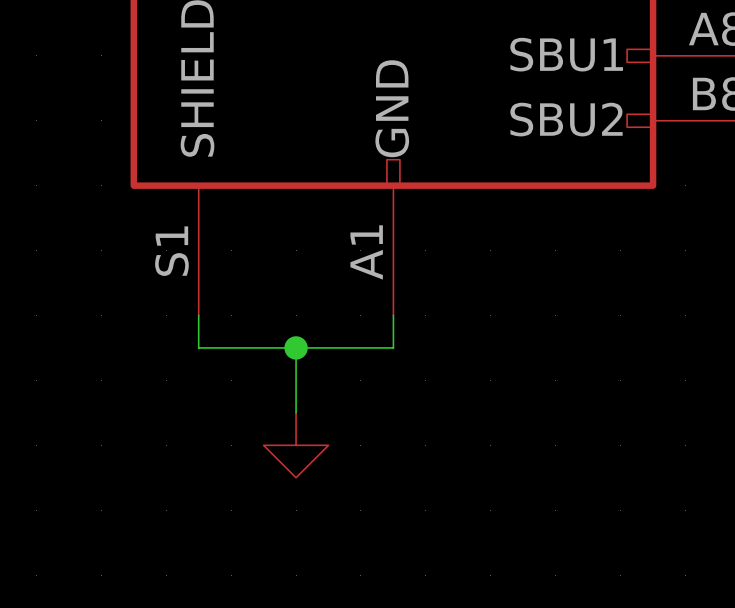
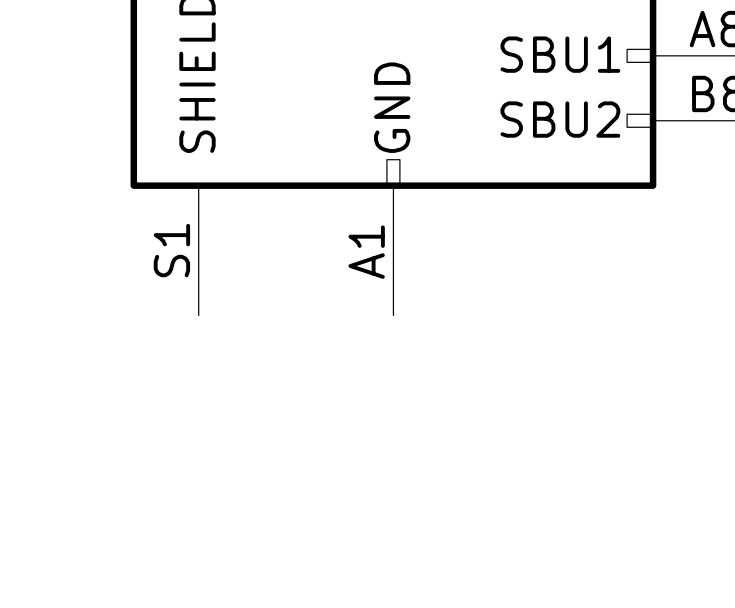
wire: (198, 315) (198, 347) (393, 347) (393, 315) -> none
wire: (296, 347) (296, 412) -> none
junction: (296, 347) -> none
power symbol: (296, 445) -> none

